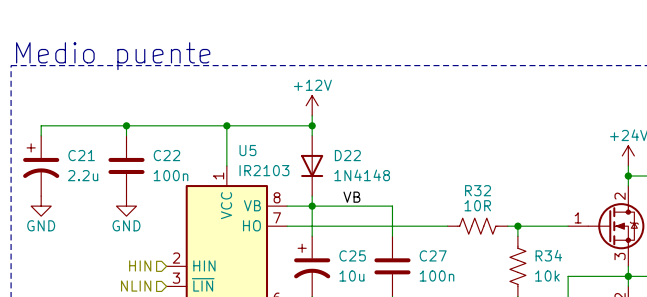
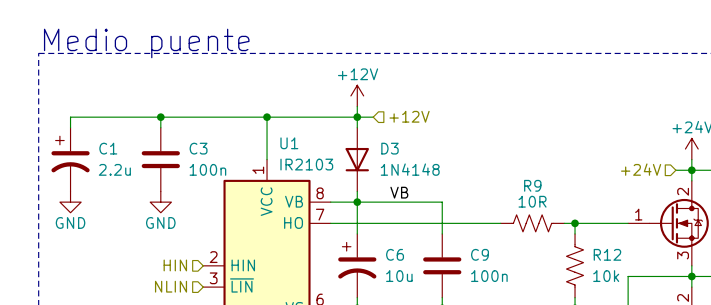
wire: none -> (357, 117) (373, 117)
hierarchical label: none -> +12V (409, 116)
U5 name: U5 (247, 150) -> U1 (289, 143)
C21 name: C21 (81, 155) -> C1 (108, 148)
C22 name: C22 (166, 155) -> C3 (198, 148)
D22 name: D22 (347, 155) -> D3 (389, 148)
hierarchical label: none -> +24V (641, 169)
wire: none -> (675, 170) (691, 170)
R32 name: R32 (478, 190) -> R9 (532, 185)
C25 name: C25 (352, 255) -> C6 (395, 254)
C27 name: C27 (433, 255) -> C9 (480, 254)
R34 name: R34 (548, 255) -> R12 (607, 254)

